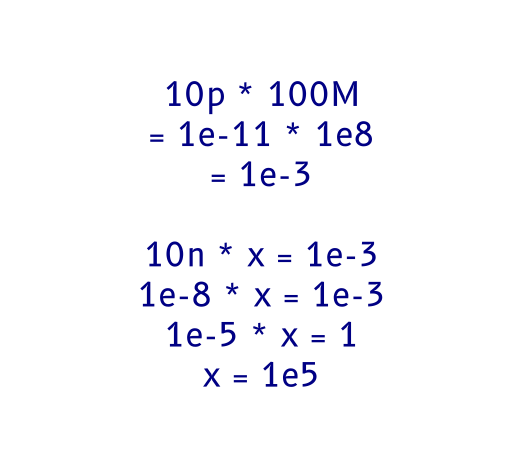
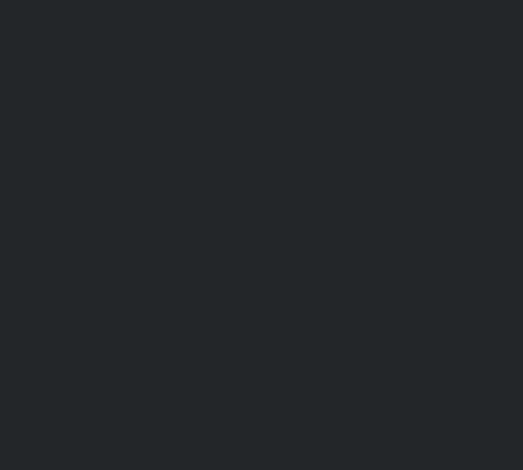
text: 10p * 100M (261, 97) -> none
text: = 1e-11 * 1e8 (261, 133) -> none
text: = 1e-3 (260, 173) -> none
text: 10n * x = 1e-3 (261, 254) -> none
text: 1e-8 * x = 1e-3 (261, 294) -> none
text: 1e-5 * x = 1 (261, 334) -> none
text: x = 1e5 (259, 374) -> none

